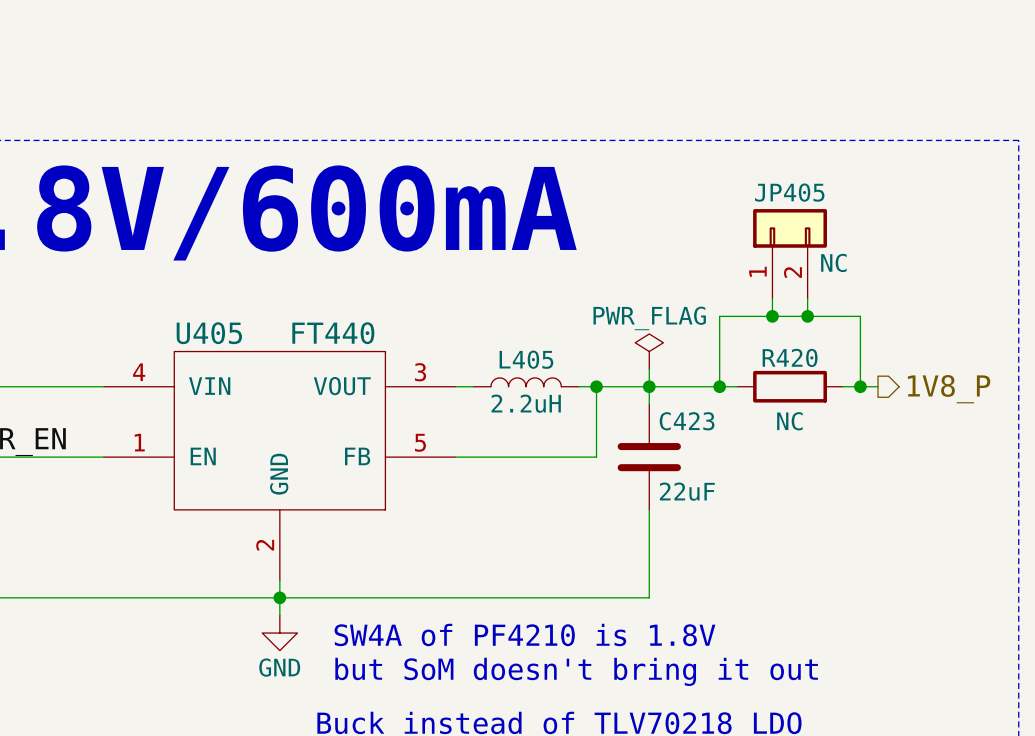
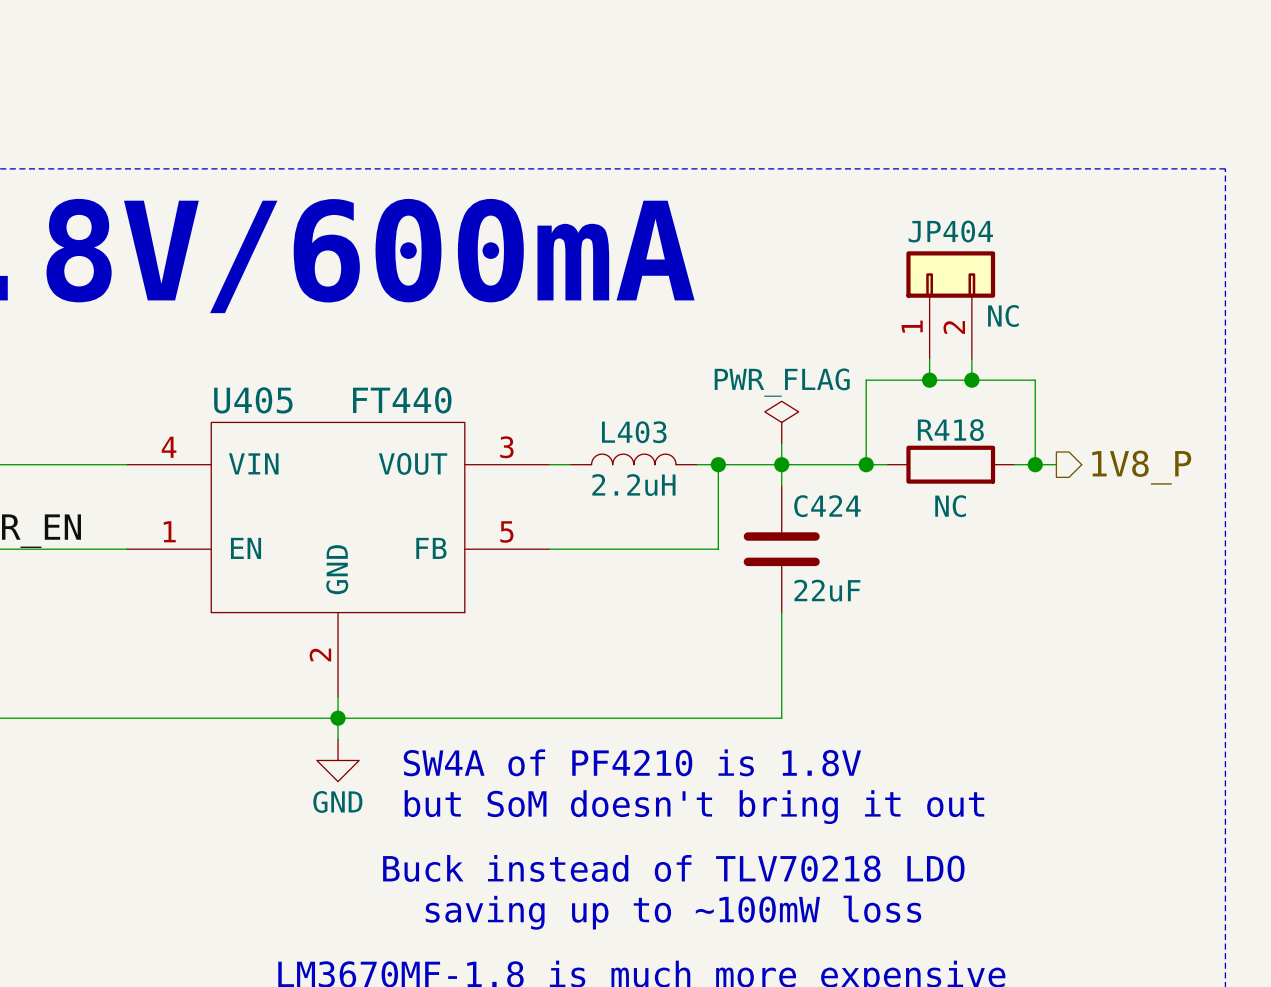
JP405 name: JP405 (789, 192) -> JP404 (950, 231)
R420 name: R420 (790, 357) -> R418 (950, 430)
L405 name: L405 (526, 359) -> L403 (634, 432)
C423 name: C423 (687, 421) -> C424 (827, 506)

